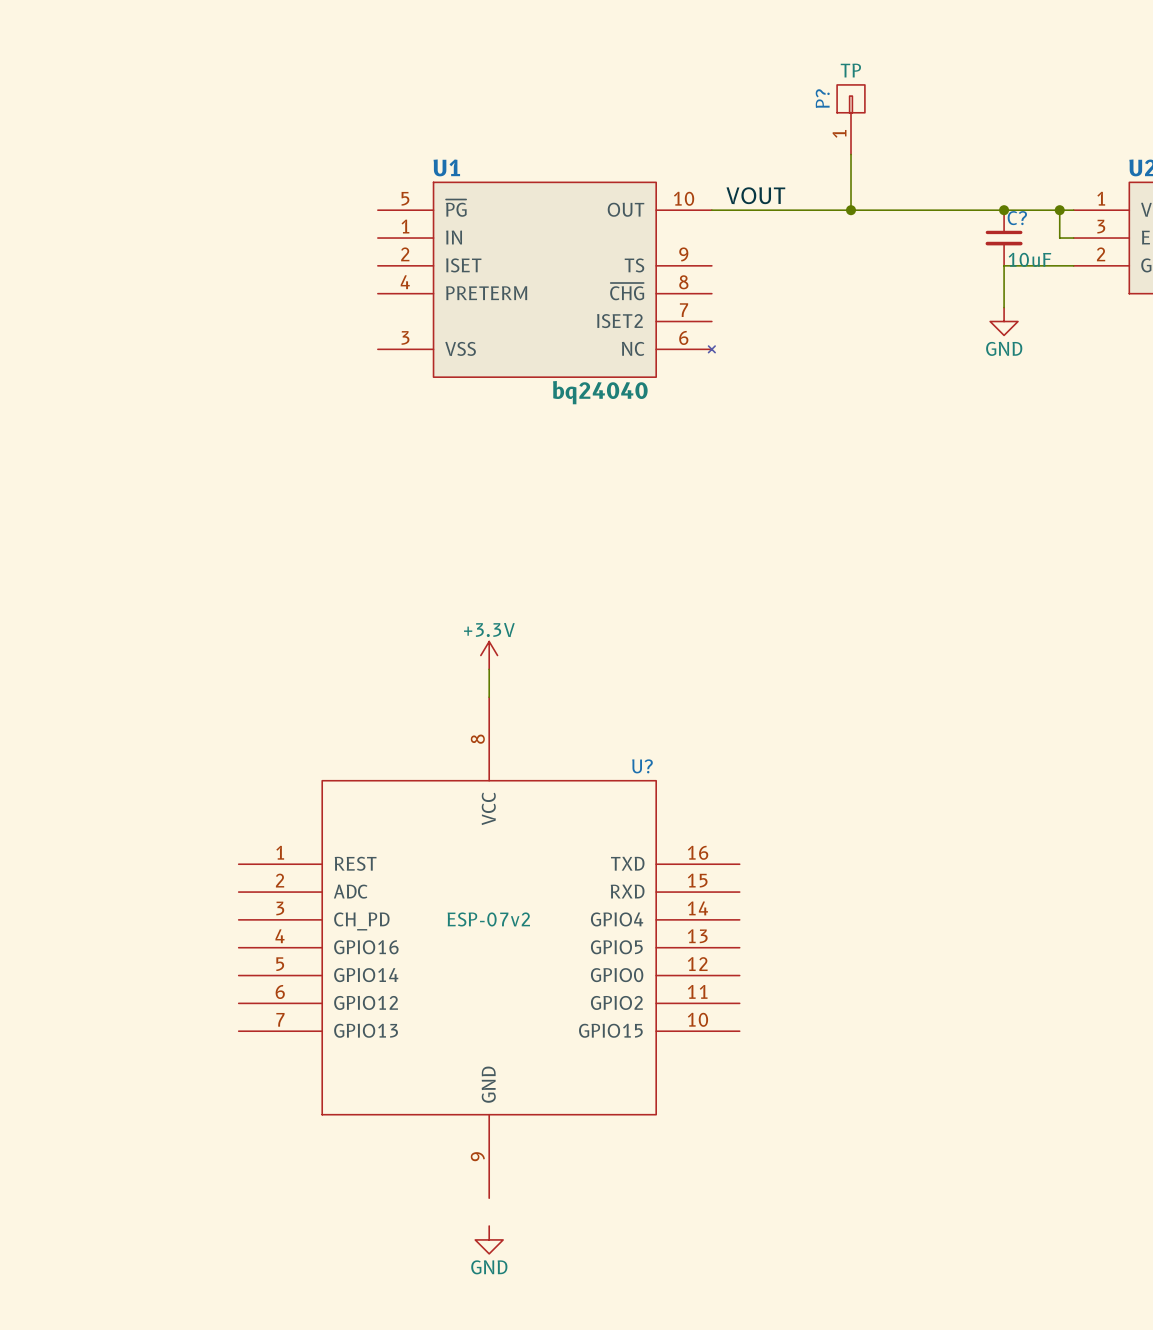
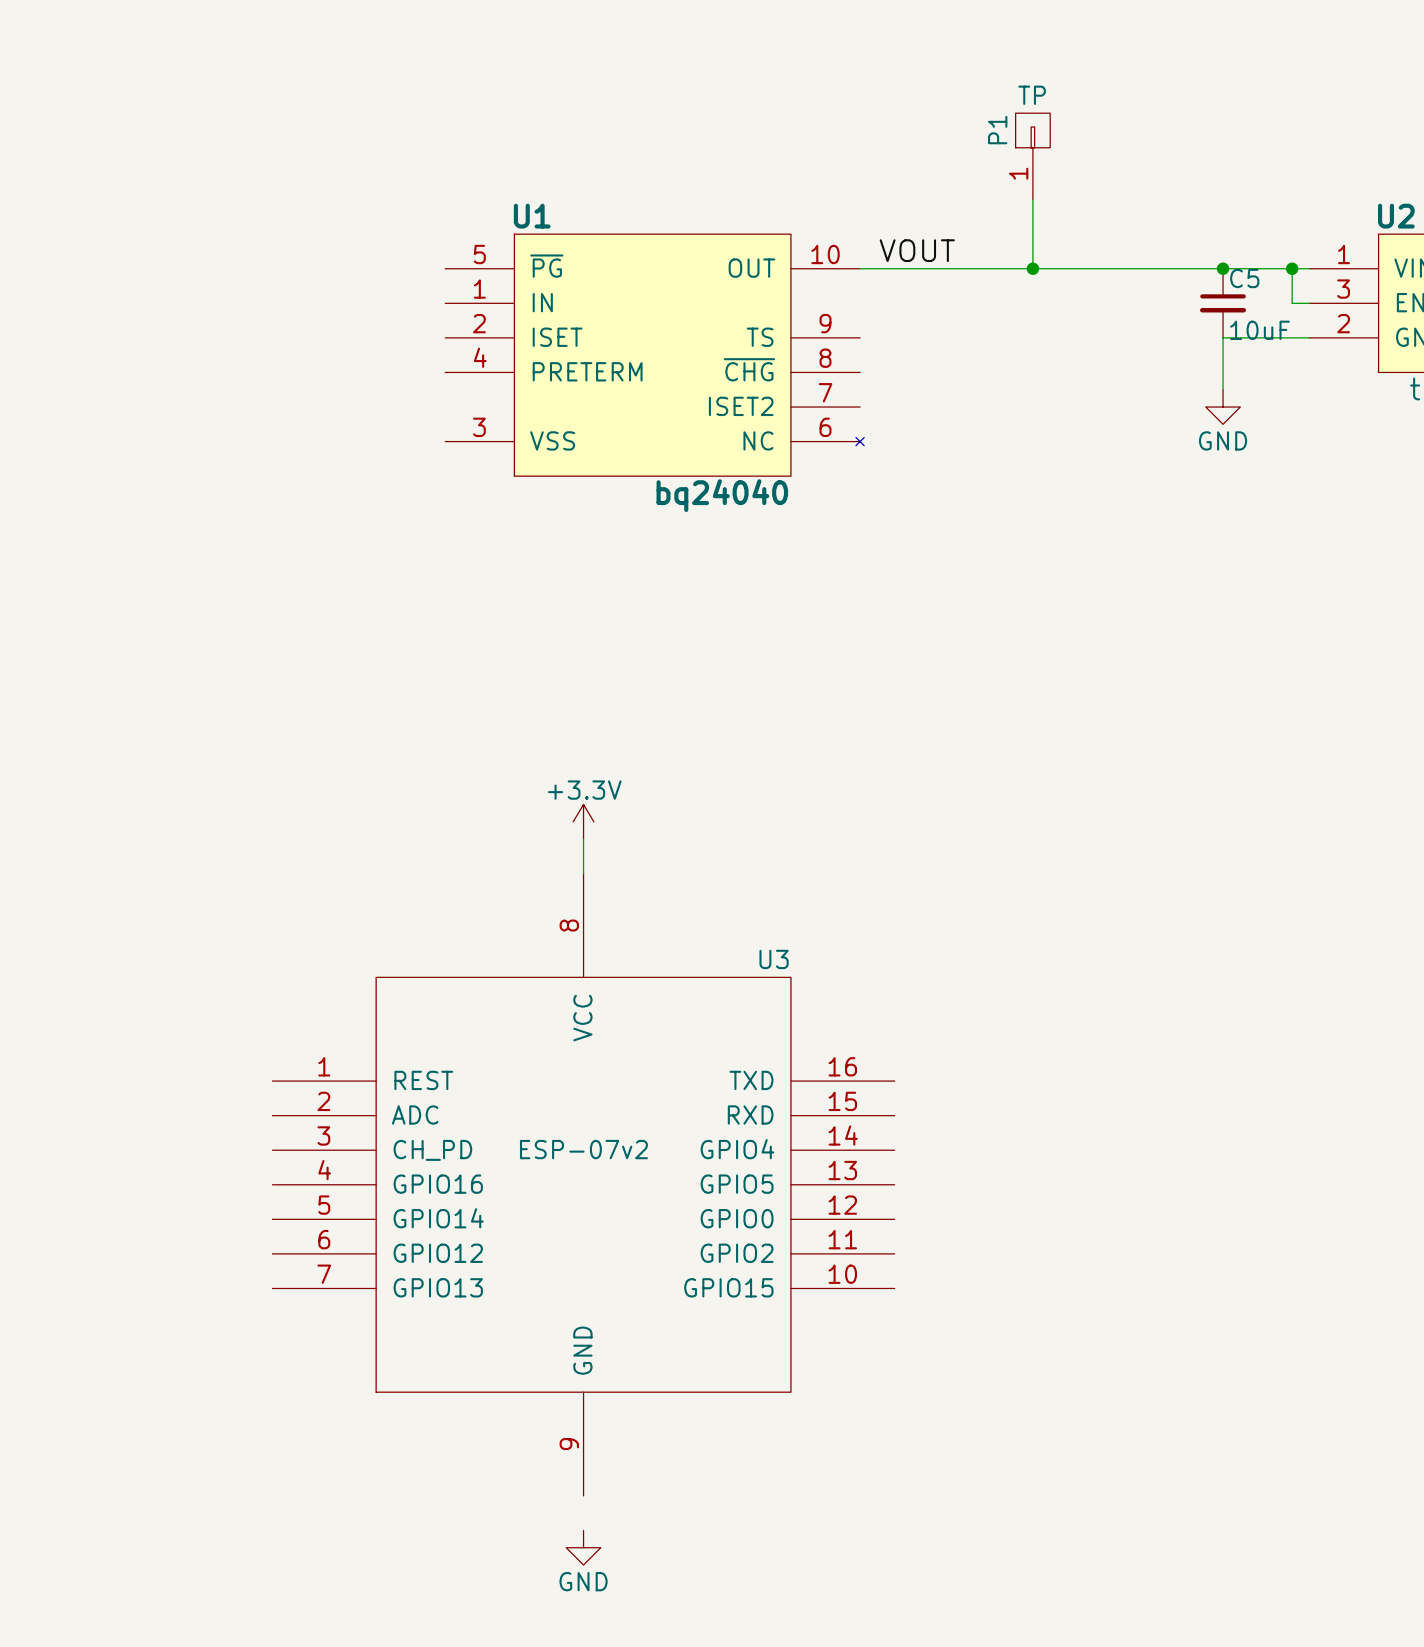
P? name: P? (822, 98) -> P1 (997, 130)
C? name: C? (1017, 218) -> C5 (1244, 278)
U? name: U? (642, 766) -> U3 (774, 959)

